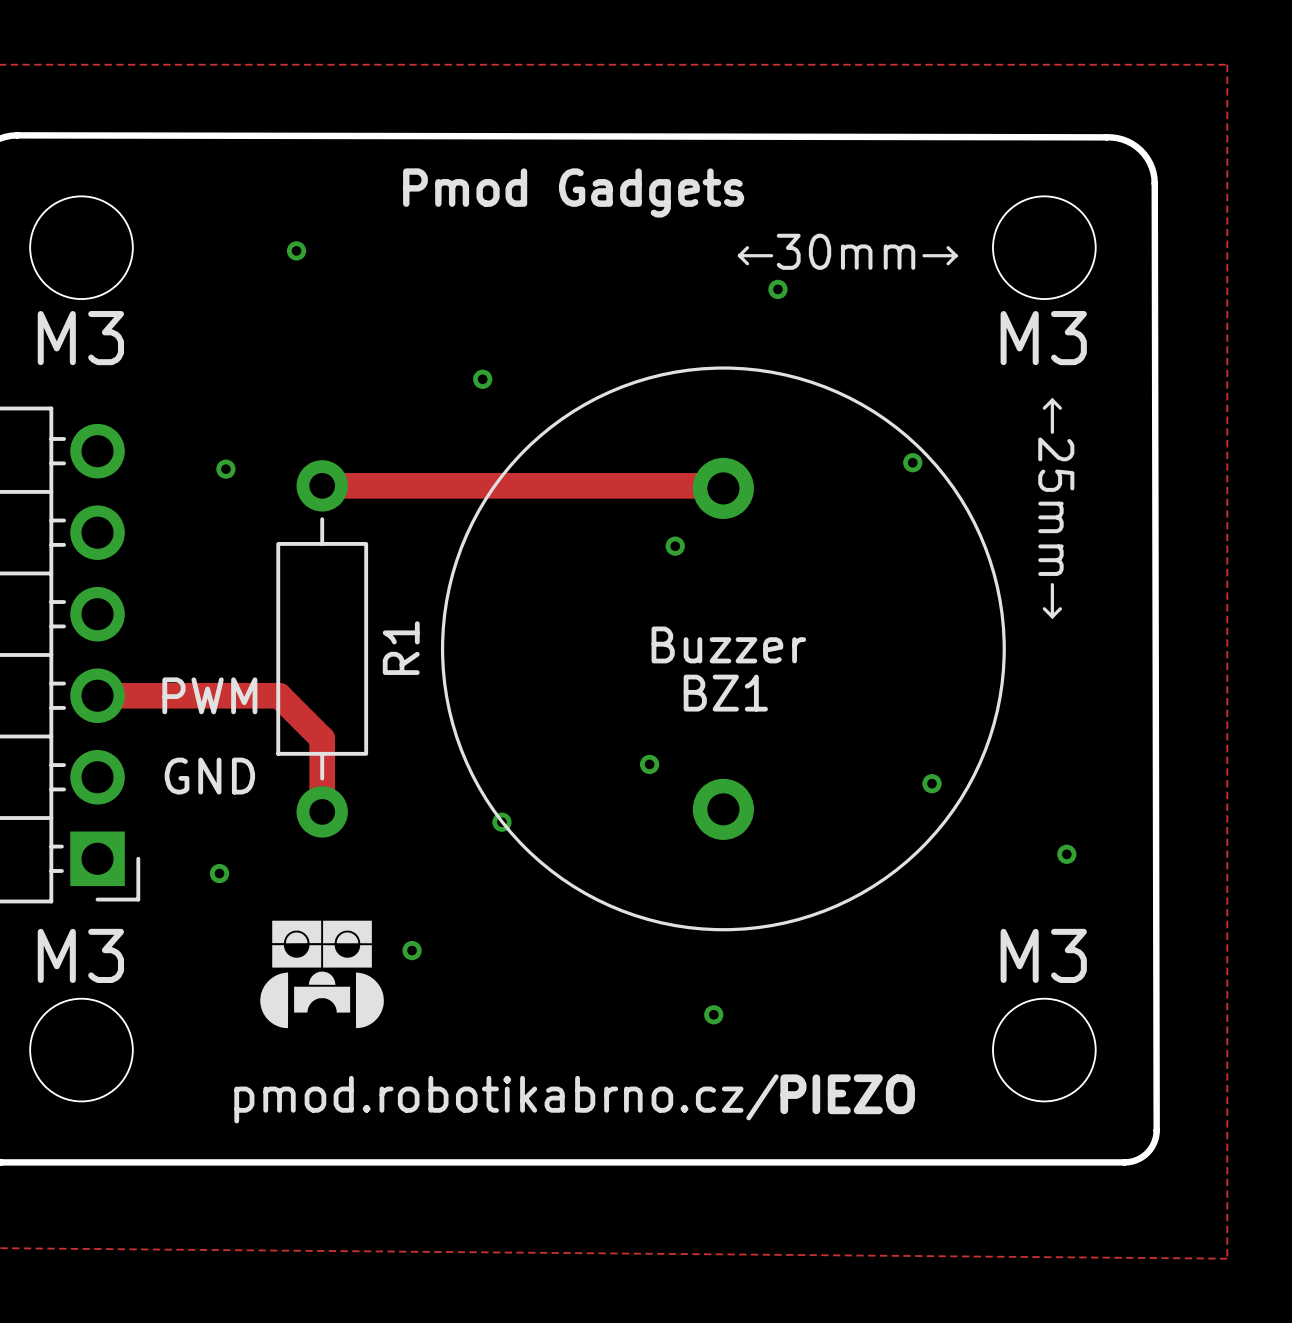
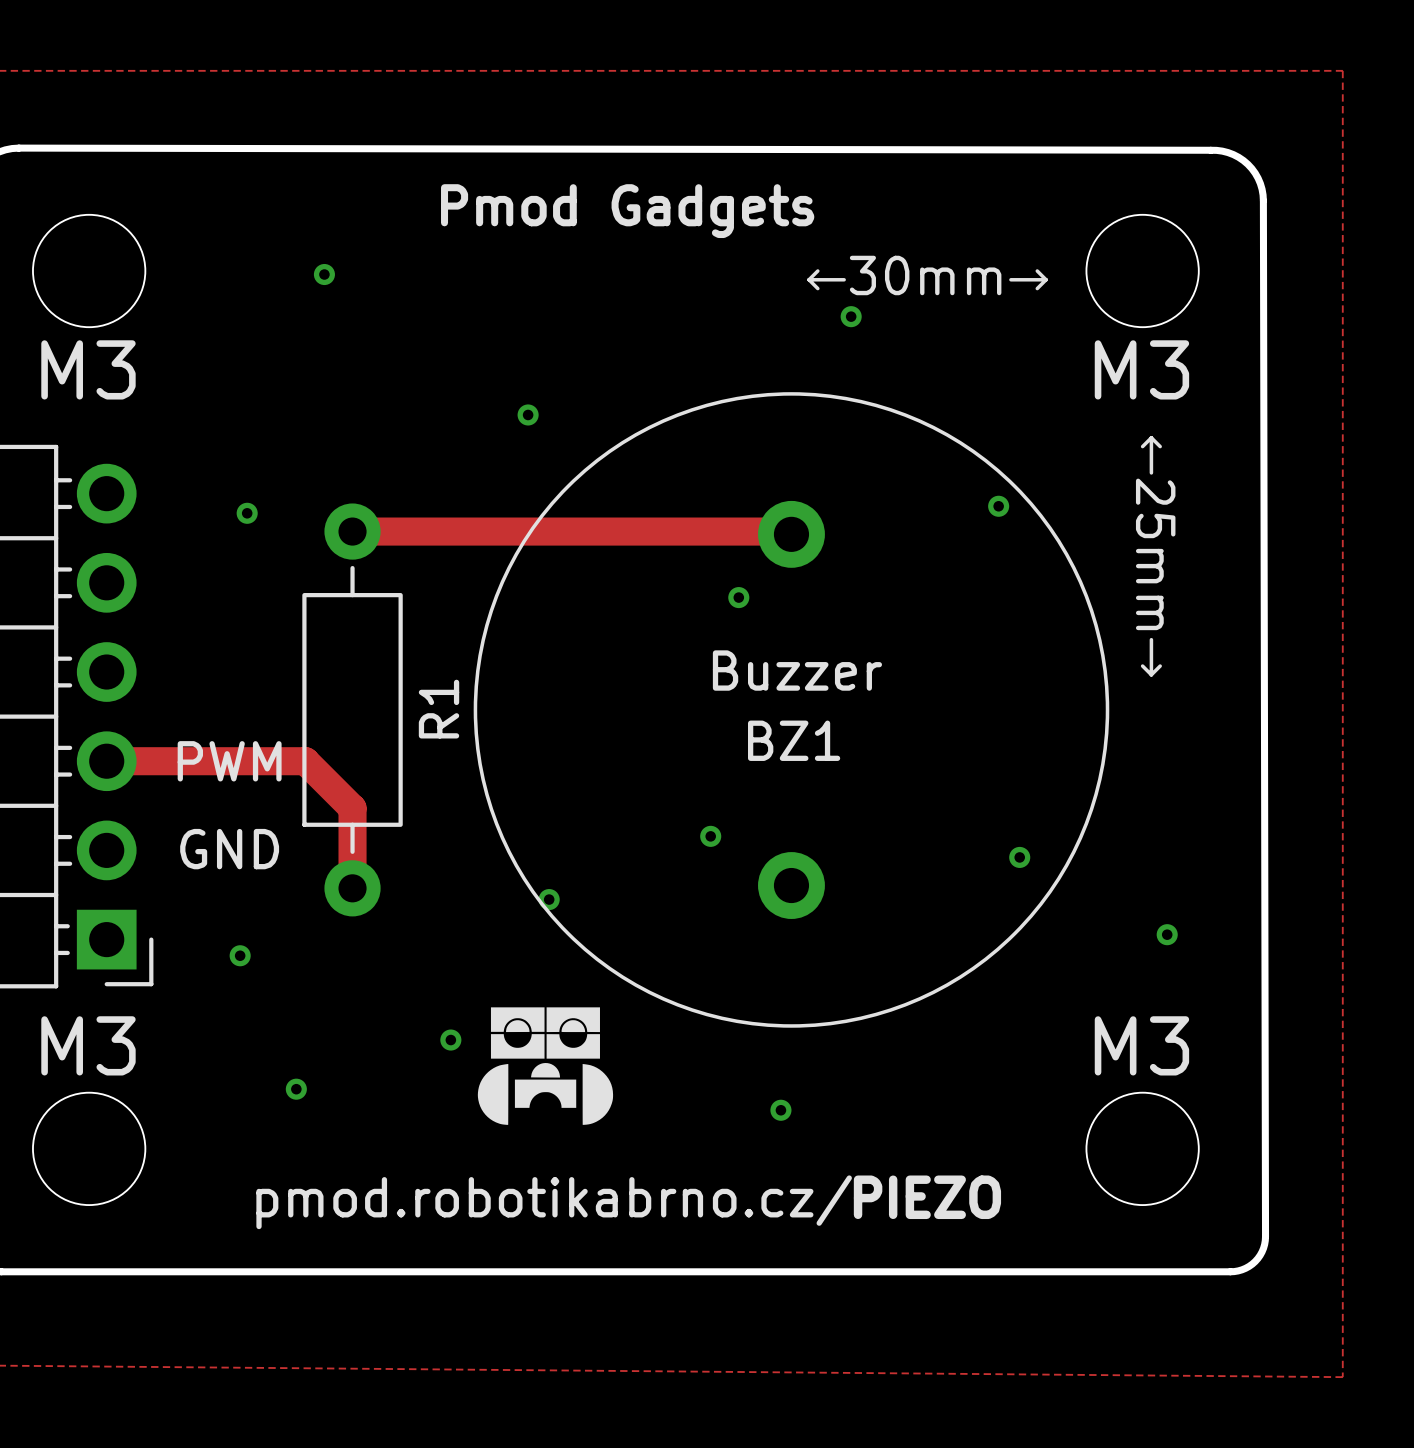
part footprint: [440, 366, 1006, 932] -> [473, 392, 1110, 1028]
text: Buzzer (728, 644) -> none
drawing position: (322, 974) -> (545, 1066)

